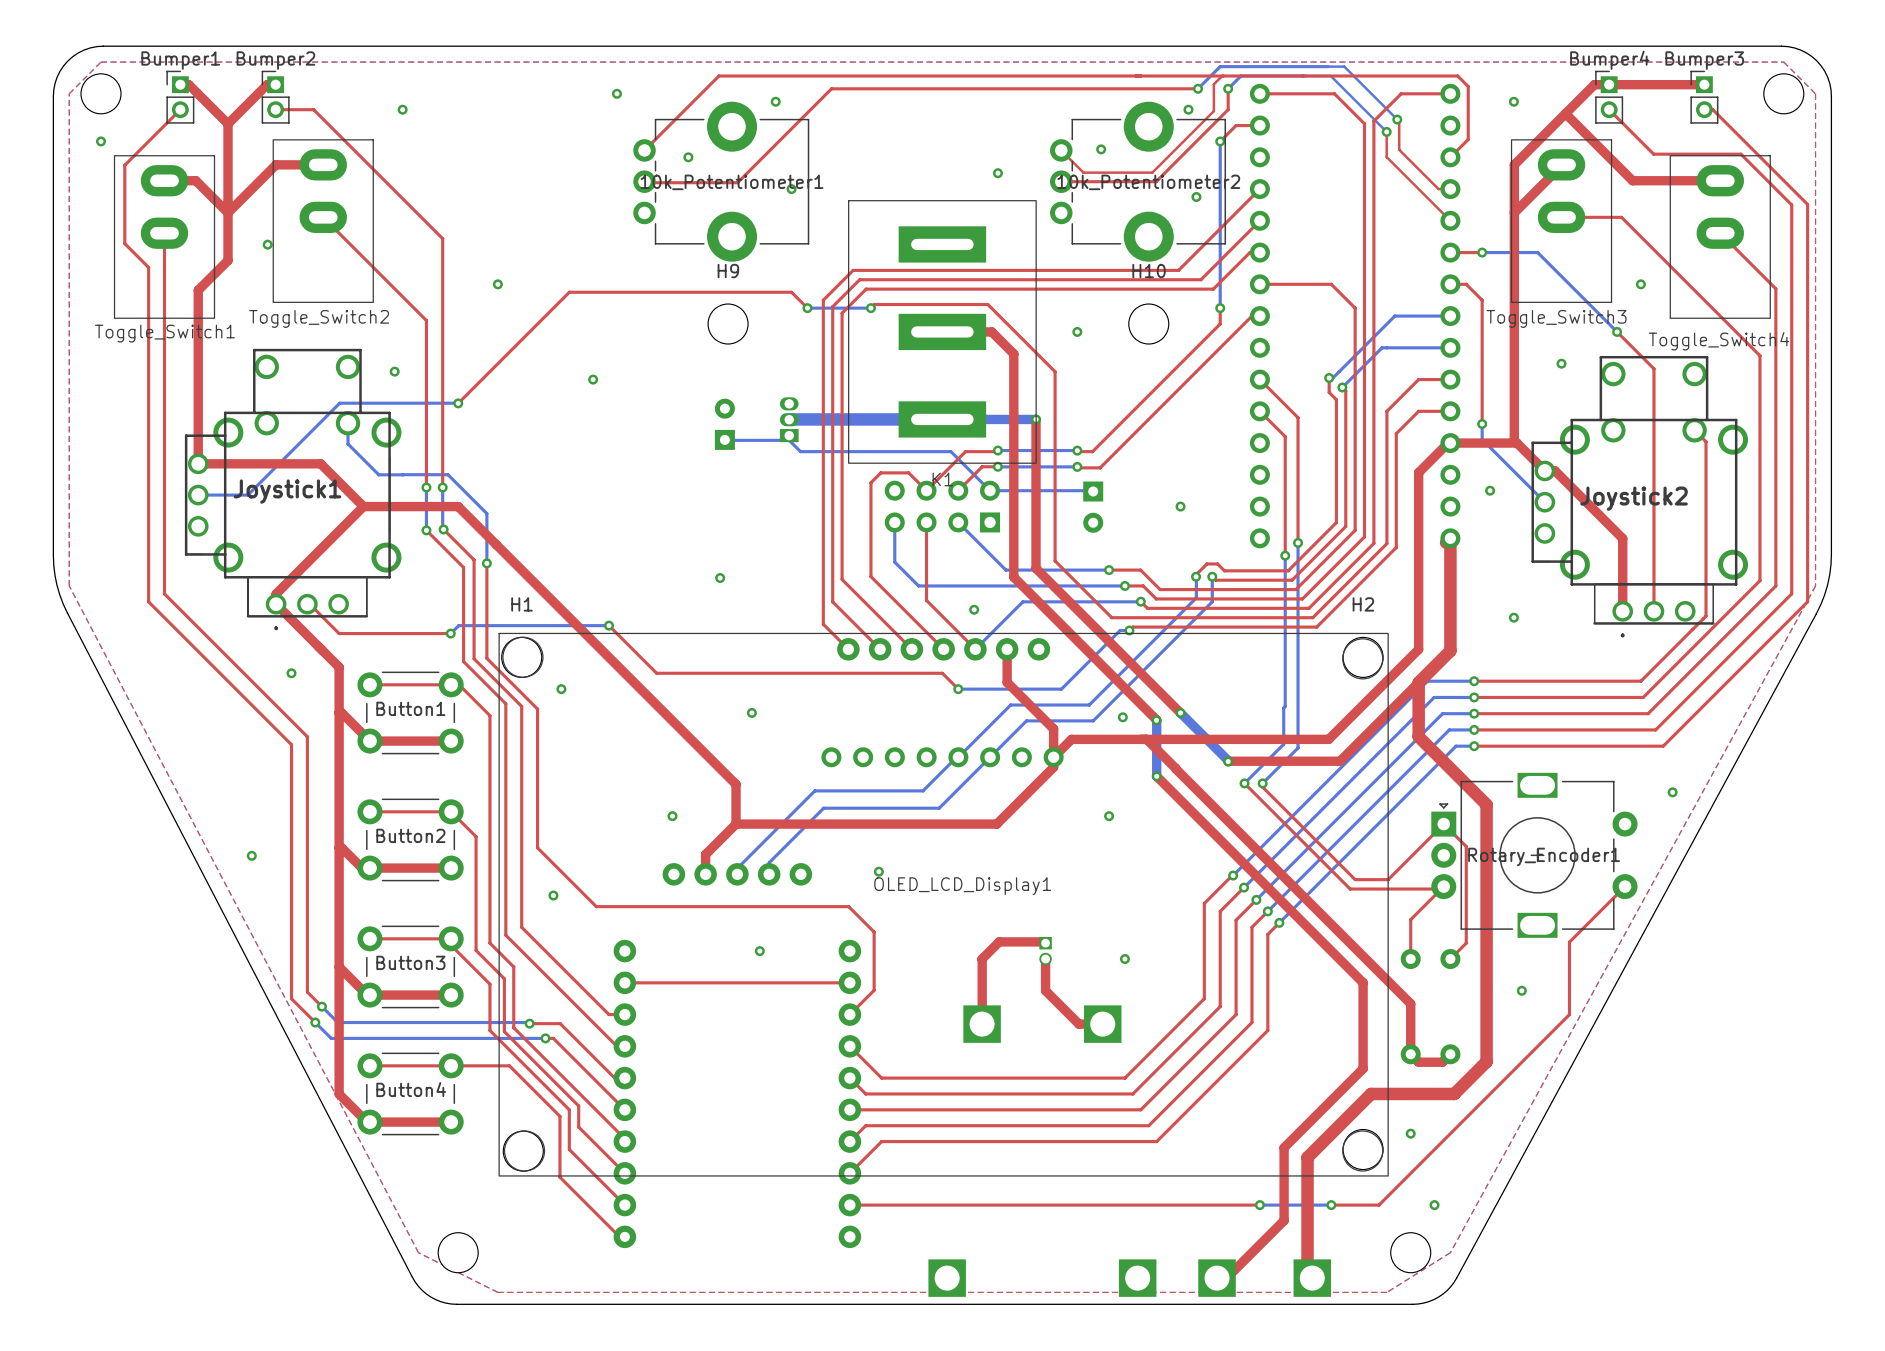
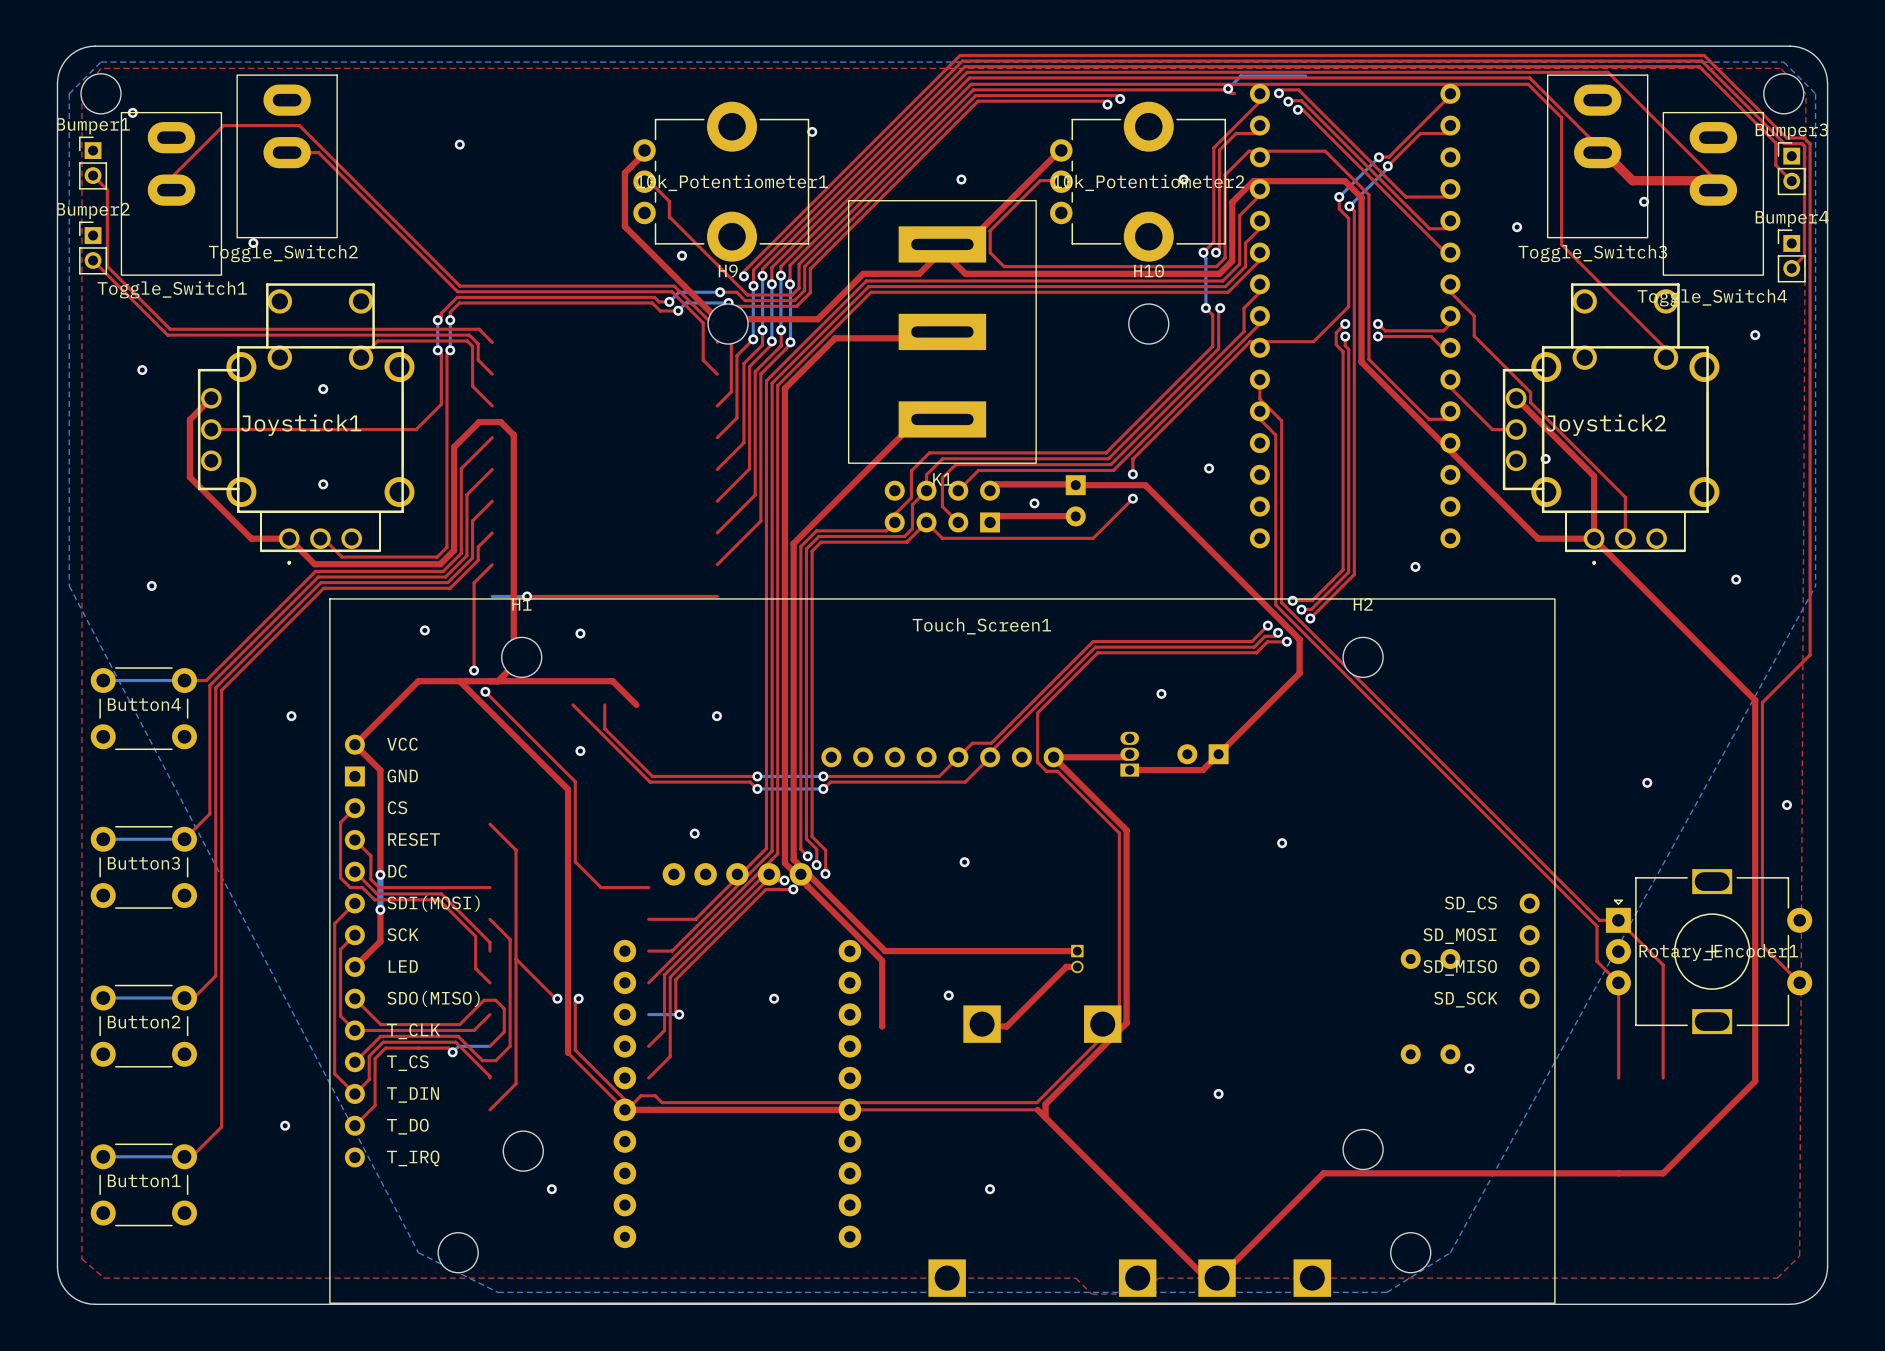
board edge: (103, 46) (84, 49) (68, 60) (57, 77) (53, 89) (53, 555) (56, 585) (67, 613) (412, 1277) (422, 1290) (430, 1297) (445, 1303) (456, 1304) -> (103, 46) (85, 47) (72, 53) (60, 69) (57, 83) (58, 1276) (68, 1293) (80, 1301) (90, 1303) (456, 1304)
board edge: (1781, 46) (1800, 49) (1816, 60) (1827, 77) (1830, 89) (1831, 554) (1827, 584) (1816, 613) (1456, 1278) (1446, 1290) (1438, 1297) (1423, 1303) (1412, 1304) -> (1781, 46) (1799, 47) (1812, 53) (1824, 69) (1827, 83) (1826, 1276) (1819, 1289) (1812, 1296) (1794, 1303) (1412, 1304)
top zone outline: (101, 62) (69, 93) (69, 585) (418, 1252) (497, 1292) (1386, 1292) (1450, 1252) (1815, 585) (1815, 93) (1783, 62) (101, 62) -> (101, 68) (81, 93) (81, 1259) (104, 1278) (1075, 1278) (1091, 1293) (1142, 1293) (1158, 1278) (1777, 1278) (1799, 1255) (1806, 93) (1780, 68) (101, 68)
top track: (1223, 76) (1213, 84) (1213, 111) (1152, 172) (1083, 172) (1061, 150) -> none
bottom track: (1302, 76) (1330, 76) (1386, 131) -> none
top track: (180, 84) (188, 84) (228, 123) -> none
top track: (275, 84) (267, 84) (228, 123) -> none
top track: (1704, 84) (1594, 84) (1514, 164) (1514, 440) (1544, 470) (1555, 470) (1622, 538) (1622, 611) -> none
top track: (1197, 88) (831, 88) (737, 182) (644, 181) -> none
bottom track: (1197, 88) (1220, 66) (1344, 66) (1397, 119) -> none
via: (1197, 88) -> none
top track: (1228, 88) (1228, 109) (1156, 181) (1061, 181) -> none
via: (616, 93) -> none
top track: none -> (1234, 93) (1230, 93) (1227, 89) (973, 89) (799, 264) (799, 288) (792, 295) (747, 295) (669, 217) (669, 201) (648, 180)
top track: (1259, 93) (1334, 93) (1364, 123) (1364, 536) (1302, 598) (1156, 598) (1143, 585) (1124, 585) -> none
top track: none -> (1278, 93) (1282, 89) (1298, 89) (1405, 197) (1450, 197)
via: none -> (1278, 93)
top track: (1450, 93) (1401, 93) (1373, 121) (1373, 543) (1308, 608) (1147, 608) (1140, 601) -> none
Bumper1 position: (180, 97) -> (93, 163)
Bumper2 position: (275, 97) -> (93, 248)
Bumper4 position: (1609, 97) -> (1791, 255)
Bumper3 position: (1704, 97) -> (1791, 168)
via: none -> (1120, 98)
via: (775, 101) -> none
top track: none -> (1288, 101) (1301, 100) (1429, 228) (1450, 228)
via: none -> (1288, 101)
top track: none -> (1450, 101) (1444, 101) (1388, 157) (1378, 157)
via: (1513, 101) -> none
top track: none -> (1107, 104) (1104, 101) (978, 101) (810, 268) (810, 292) (796, 306) (731, 306) (728, 303)
via: none -> (1107, 104)
top track: (180, 109) (124, 165) (124, 243) (148, 267) (148, 601) (291, 744) (291, 998) (315, 1022) -> none
top track: (275, 109) (313, 109) (442, 238) (442, 487) -> none
via position: (402, 109) -> (459, 144)
via: (1188, 109) -> none
top track: none -> (1297, 109) (1302, 109) (1450, 257) (1450, 260)
via: none -> (1297, 109)
top track: (1609, 109) (1653, 154) (1740, 154) (1791, 204) (1791, 593) (1655, 729) (1474, 729) -> none
top track: (1704, 109) (1712, 109) (1807, 204) (1807, 601) (1663, 746) (1474, 746) -> none
top track: none -> (1565, 113) (1529, 77) (969, 77) (780, 266) (780, 275)
top track width: thick (1565, 113) (1597, 145) -> thin (1565, 113) (1597, 145)
top track: (1397, 119) (1399, 121) (1399, 149) (1438, 189) (1450, 189) -> none
via: (1397, 119) -> none
top track: (228, 123) (228, 260) (198, 290) (198, 463) (320, 463) (363, 506) -> none
top track: (1236, 125) (1259, 125) -> (1236, 125) (1259, 101)
via: none -> (812, 131)
top track: (1386, 131) (1386, 157) (1450, 220) -> none
via: (1386, 131) -> none
top track: none -> (1259, 133) (1236, 133) (1219, 150) (1219, 249) (1216, 252)
top track: none -> (1450, 133) (1420, 133) (1387, 166)
via position: (101, 141) -> (132, 112)
top track: none -> (1220, 141) (1213, 147) (1213, 241) (1203, 252)
bottom track: (1220, 141) (1220, 308) -> none
via: (1220, 141) -> none
top track: none -> (648, 149) (624, 172) (624, 226) (717, 319) (817, 319) (863, 273) (919, 273) (942, 250)
top track: none -> (1061, 149) (959, 250) (942, 250)
via: (1101, 149) -> none
top track: (644, 150) (718, 76) (1457, 76) (1468, 86) (1468, 139) (1450, 157) -> none
top track: none -> (287, 152) (318, 152) (457, 291) (672, 291) (703, 322) (703, 360) (717, 374)
via: (688, 157) -> none
bottom track: none -> (1378, 157) (1339, 197)
via: none -> (1378, 157)
top track: (323, 164) (276, 164) (228, 212) (195, 180) (164, 180) -> none
top track: none -> (1561, 164) (1561, 117) (1528, 84) (971, 84) (790, 265) (790, 284)
top track: (1561, 165) (1514, 212) -> (1561, 165) (1561, 244) (1665, 349) (1665, 357)
bottom track: none -> (1387, 166) (1349, 206)
via: none -> (1387, 166)
via position: (997, 173) -> (961, 179)
top track: none -> (93, 175) (107, 189) (107, 266) (170, 329) (479, 329) (492, 342)
top track: none -> (1061, 180) (1040, 180) (990, 230) (990, 252) (1004, 266) (1216, 266) (1225, 258) (1225, 175) (1248, 151) (1325, 151) (1368, 194) (1368, 359) (1428, 419) (1450, 419)
top track: none -> (1791, 181) (1775, 165) (1775, 143) (1699, 66) (964, 66) (762, 268) (762, 275)
via: (791, 189) -> none
top track: (1259, 189) (1178, 270) (853, 270) (823, 300) (823, 624) (848, 649) -> none
top track: none -> (171, 190) (171, 177) (223, 125) (299, 125) (460, 286) (674, 286) (717, 329) (717, 342)
top track: none -> (1713, 190) (1713, 177) (1608, 72) (967, 72) (771, 267) (771, 284)
via position: (1196, 197) -> (1183, 179)
top track: none -> (1259, 197) (1239, 215) (1239, 264) (1222, 281) (866, 281) (766, 380) (766, 848) (695, 919) (648, 919)
top track: none -> (1339, 197) (1339, 208) (1348, 218) (1348, 306) (1313, 341) (1250, 341) (1132, 458) (1132, 474)
via: none -> (1339, 197)
via: none -> (1644, 201)
top track: none -> (1349, 206) (1354, 211) (1354, 574) (1310, 618)
via: none -> (1349, 206)
top track: (323, 217) (426, 320) (426, 487) -> none
top track: (1561, 217) (1621, 217) (1759, 355) (1759, 580) (1643, 697) (1474, 697) -> none
top track: (1259, 220) (1200, 279) (859, 279) (832, 306) (832, 601) (880, 649) -> none
Toggle_Switch2 position: (323, 221) -> (287, 156)
Toggle_Switch3 position: (1561, 221) -> (1597, 156)
top track: (164, 233) (164, 593) (307, 736) (307, 992) (321, 1006) -> none
top track: (1720, 233) (1775, 288) (1775, 585) (1648, 713) (1474, 713) -> none
Toggle_Switch1 position: (164, 236) -> (171, 193)
Toggle_Switch4 position: (1720, 236) -> (1713, 193)
via position: (267, 244) -> (253, 243)
top track: none -> (942, 250) (965, 273) (1219, 273) (1232, 261) (1232, 202) (1253, 181) (1344, 181) (1361, 197) (1361, 362) (1538, 538) (1594, 538)
bottom track: none -> (1203, 252) (1205, 258) (1205, 308)
via: none -> (1203, 252)
via: none -> (1216, 252)
top track: (1259, 252) (1249, 252) (1213, 289) (866, 289) -> (1259, 228) (1245, 243) (1245, 266) (1225, 286) (868, 286) (866, 289)
top track: (1450, 252) (1482, 252) -> none
bottom track: (1482, 252) (1537, 252) (1617, 331) -> none
via position: (1482, 252) -> (1517, 227)
via: none -> (682, 255)
top track: none -> (93, 260) (167, 335) (469, 335) (478, 344) (478, 360) (492, 374)
top track: none -> (1259, 260) (1228, 292) (870, 292) (777, 385) (777, 853) (648, 982)
top track: none -> (1791, 268) (1804, 255) (1804, 146) (1801, 143) (1784, 143) (1701, 61) (962, 61) (753, 270) (753, 285)
bottom track: none -> (762, 275) (762, 330)
via: none -> (762, 275)
bottom track: none -> (780, 275) (781, 330)
via: none -> (780, 275)
top track: none -> (743, 276) (743, 271) (960, 55) (1704, 55) (1786, 138) (1804, 138) (1810, 143) (1810, 654) (1762, 702) (1762, 945) (1799, 982)
via: none -> (743, 276)
via: (497, 284) -> none
bottom track: none -> (771, 284) (771, 341)
via: none -> (771, 284)
bottom track: none -> (790, 284) (790, 342)
via: none -> (790, 284)
top track: (1259, 284) (1331, 284) (1355, 308) (1355, 530) (1295, 589) (1160, 589) (1140, 570) (1109, 570) -> none
top track: (1450, 284) (1466, 284) (1482, 300) (1482, 424) -> none
via: (1640, 284) -> none
bottom track: none -> (753, 285) (753, 339)
via: none -> (753, 285)
top track: (720, 292) (569, 292) (458, 403) -> none
bottom track: none -> (720, 292) (679, 292) (669, 301)
via: none -> (720, 292)
top track: (736, 292) (791, 292) (807, 308) -> (736, 292) (745, 300) (794, 300) (804, 290) (804, 266) (975, 95) (1116, 95) (1120, 98)
top track: none -> (1259, 292) (1244, 308) (1244, 331) (1110, 464) (955, 464) (942, 478) (942, 506) (958, 522)
top track: none -> (1450, 292) (1474, 316) (1474, 335) (1530, 392) (1530, 402) (1625, 497) (1625, 538)
top track: none -> (669, 301) (659, 301) (654, 297) (457, 297) (441, 313) (441, 316) (437, 320)
via: none -> (669, 301)
bottom track: none -> (728, 303) (685, 303) (678, 310)
via: none -> (728, 303)
bottom track: (807, 308) (870, 308) -> none
via: (807, 308) -> none
top track: (870, 308) (874, 304) (987, 304) (1055, 371) (1055, 560) (1111, 617) (1312, 617) (1386, 543) (1386, 411) (1418, 379) (1450, 379) -> none
via: (870, 308) -> none
top track: none -> (1205, 308) (1212, 315) (1212, 346) (1106, 452) (929, 452) (911, 470) (911, 497) (894, 514) (894, 522) (886, 530) (816, 530) (800, 546) (800, 849) (807, 856)
via: none -> (1205, 308)
top track: none -> (1218, 308) (1218, 348) (1108, 458) (942, 458) (926, 474) (926, 490) (912, 504) (912, 528) (904, 536) (818, 536) (806, 548) (806, 838) (816, 849) (816, 860)
top track: (1220, 308) (1220, 324) (1092, 451) (1077, 450) -> none
top track: none -> (678, 310) (660, 310) (652, 303) (459, 303) (450, 312) (450, 320)
via: none -> (678, 310)
top track: (842, 313) (842, 579) (911, 649) -> (842, 313) (772, 383) (772, 851) (672, 951) (648, 951)
top track: (1259, 316) (1251, 316) (1100, 467) (1077, 466) -> none
bottom track: (1450, 316) (1394, 316) (1332, 378) (1329, 378) -> none
bottom track: none -> (437, 320) (437, 350)
via: none -> (437, 320)
bottom track: none -> (450, 320) (450, 350)
via: none -> (450, 320)
top track: none -> (1345, 324) (1336, 332) (1336, 344) (1343, 351) (1343, 569) (1312, 600) (1292, 600)
via: none -> (1345, 324)
top track: none -> (1378, 324) (1385, 330) (1443, 330) (1450, 324)
via: none -> (1378, 324)
top track: none -> (743, 330) (731, 342) (731, 391) (717, 405)
top track: none -> (762, 330) (762, 344) (743, 363) (743, 442) (717, 469)
via: none -> (762, 330)
top track: none -> (781, 330) (781, 345) (755, 371) (755, 495) (717, 532)
via: none -> (781, 330)
top track: (942, 331) (991, 331) (1013, 353) (1013, 577) (1156, 720) -> none
via: (1077, 331) -> none
top track: (1617, 331) (1653, 368) (1653, 611) -> none
via: (1617, 331) -> none
via: none -> (1755, 335)
top track: none -> (1345, 336) (1345, 345) (1348, 349) (1348, 572) (1311, 609) (1301, 609)
via: none -> (1345, 336)
top track: none -> (1378, 336) (1431, 336) (1450, 355)
via: none -> (1378, 336)
top track: none -> (942, 338) (835, 338) (784, 388) (784, 863) (882, 960) (882, 1026)
top track: none -> (753, 339) (736, 355) (736, 418) (717, 437)
via: none -> (753, 339)
top track: none -> (771, 341) (771, 344) (749, 366) (749, 468) (717, 501)
via: none -> (771, 341)
top track: none -> (790, 342) (760, 374) (760, 521) (717, 564)
via: none -> (790, 342)
bottom track: (1450, 347) (1382, 347) (1342, 387) -> none
top track: none -> (437, 350) (441, 353) (441, 404) (416, 429) (211, 429)
via: none -> (437, 350)
via: none -> (450, 350)
top track: none -> (446, 353) (446, 547) (437, 557) (341, 557) (322, 537) (320, 538)
top track: none -> (361, 357) (377, 341) (467, 341) (472, 346) (472, 386) (492, 405)
via: (1561, 363) -> none
via: none -> (142, 370)
via: (394, 371) -> none
top track: (1329, 378) (1329, 392) (1336, 399) (1336, 522) (1288, 570) (1224, 570) (1217, 563) (1206, 563) (1196, 576) -> none
via: (1329, 378) -> none
via: (593, 379) -> none
top track: (1259, 379) (1298, 417) (1298, 542) -> none
top track: none -> (1259, 387) (1259, 399) (1281, 420) (1281, 602) (1599, 920) (1618, 920) (1663, 965) (1663, 1078)
top track: (1342, 387) (1345, 390) (1345, 526) (1292, 580) (1215, 580) (1212, 576) -> none
via: (1342, 387) -> none
top track: none -> (1450, 387) (1492, 429) (1516, 429)
via: none -> (323, 389)
top track: none -> (211, 398) (189, 419) (189, 477) (251, 538) (289, 538) (314, 564) (440, 564) (454, 550) (454, 447) (479, 422) (500, 422) (513, 435) (513, 665) (497, 681)
bottom track: (458, 403) (339, 403) (247, 495) (198, 495) -> none
via: (458, 403) -> none
top track: (1259, 411) (1285, 436) (1285, 555) -> none
top track: (1450, 411) (1418, 411) (1396, 433) (1396, 547) (1316, 627) (1132, 627) (1129, 630) -> none
part: (789, 419) -> none
bottom track: (790, 419) (1036, 419) -> none
top track: (1036, 419) (1036, 568) (1180, 712) -> none
via: (1036, 419) -> none
top track: none -> (1259, 419) (1275, 435) (1275, 605) (1596, 926) (1596, 961) (1618, 983) (1618, 1078)
bottom track: (348, 423) (348, 444) (378, 474) (402, 474) -> none
part: (724, 424) -> none
bottom track: (1482, 424) (1482, 439) (1544, 502) -> none
via: (1482, 424) -> none
top track: none -> (942, 425) (911, 425) (793, 543) (793, 859) (885, 951) (1077, 951)
top track: (1694, 430) (1706, 441) (1706, 616) (1640, 681) (1474, 681) -> none
top track: none -> (492, 437) (461, 468) (461, 553) (443, 571) (315, 571) (206, 680) (184, 680)
bottom track: (724, 439) (789, 440) (800, 451) (950, 451) (990, 490) (1093, 491) -> none
top track: (1516, 443) (1448, 443) (1418, 472) (1418, 649) (1328, 739) (1071, 739) (1053, 757) -> none
top track: (997, 450) (965, 451) (926, 490) (908, 472) (880, 472) (870, 482) (870, 576) (943, 649) -> none
bottom track: (997, 450) (1077, 450) -> none
via: (997, 450) -> none
via: (1077, 450) -> none
via: none -> (1545, 458)
top track: (997, 466) (982, 466) (978, 470) -> (1259, 324) (1113, 470) (978, 470)
via: (997, 466) -> none
bottom track: (998, 466) (1077, 466) -> none
via: (1077, 466) -> none
via: none -> (1209, 468)
top track: none -> (492, 469) (466, 494) (466, 555) (445, 577) (318, 577) (209, 685) (209, 813) (184, 839)
bottom track: (402, 474) (448, 474) (486, 513) (486, 563) -> none
via: none -> (1132, 474)
via: none -> (323, 484)
bottom track: (426, 487) (426, 530) -> none
via: (426, 487) -> none
bottom track: (442, 487) (443, 529) -> none
via: (442, 487) -> none
Joystick1 position: (293, 489) -> (306, 423)
top track: none -> (990, 490) (996, 484) (1145, 485) (1299, 639) (1299, 673) (1202, 770) (1129, 770)
via: (1490, 490) -> none
Joystick2 position: (1639, 496) -> (1611, 423)
top track: none -> (1132, 498) (1093, 538) (942, 538) (926, 522) (906, 542) (821, 542) (812, 551) (812, 836) (825, 850) (825, 873)
via: none -> (1132, 498)
top track: none -> (492, 501) (472, 520) (472, 557) (447, 582) (320, 582) (215, 687) (215, 975) (193, 998) (184, 998)
via: none -> (1034, 503)
top track: (363, 506) (276, 593) (276, 604) (339, 667) (339, 1094) (367, 1122) (451, 1122) -> none
top track: (363, 506) (458, 506) (736, 784) (736, 824) -> none
via: (1180, 506) -> none
part position: (1093, 507) -> (1075, 500)
top track: none -> (1075, 516) (996, 516) (990, 522)
bottom track: (894, 522) (894, 562) (918, 585) (1124, 585) -> none
top track: (926, 522) (926, 600) (975, 649) -> none
bottom track: (958, 522) (1005, 570) (1109, 570) -> none
top track: (443, 529) (474, 559) (474, 582) -> (492, 564) (474, 582)
via: (443, 529) -> none
top track: (426, 530) (463, 567) (463, 661) (505, 703) (505, 935) -> (489, 919) (505, 935)
via: (426, 530) -> none
top track: none -> (492, 532) (478, 547) (478, 560) (450, 588) (323, 588) (221, 690) (221, 1126) (191, 1156) (184, 1156)
bottom track: (1298, 542) (1298, 748) (1262, 783) -> none
via: (1298, 542) -> none
top track: (1446, 542) (1450, 538) (1450, 650) (1418, 682) -> none
bottom track: (1285, 555) (1283, 744) (1244, 783) -> none
via: (1285, 555) -> none
top track: (486, 563) (486, 658) (537, 709) (537, 847) (596, 906) (848, 906) (874, 932) (874, 990) (849, 1014) -> none
via: (486, 563) -> none
via: none -> (1415, 566)
via: (1109, 570) -> none
bottom track: (1196, 576) (1196, 597) (1089, 705) (1010, 705) (923, 790) (814, 790) (737, 868) (737, 874) -> none
via: (1196, 576) -> none
bottom track: (1212, 576) (1212, 601) (1093, 720) (1026, 720) (939, 808) (823, 808) (769, 862) (769, 874) -> none
via: (1212, 576) -> none
via: (720, 578) -> none
via: none -> (1736, 579)
via: none -> (151, 585)
via: (1124, 585) -> none
bottom track: none -> (492, 596) (527, 596)
top track: none -> (527, 596) (717, 596)
via: none -> (527, 596)
via: none -> (1292, 600)
bottom track: (1140, 601) (1022, 601) (975, 649) -> none
via: (1140, 601) -> none
top track: (307, 604) (309, 604) (339, 633) (450, 633) -> none
via: (974, 609) -> none
via: none -> (1301, 609)
via: (1513, 617) -> none
via: none -> (1310, 618)
top track: (609, 625) (656, 673) (942, 673) (958, 689) -> none
bottom track: (609, 625) (458, 625) (450, 633) -> none
via: (609, 625) -> none
top track: none -> (1267, 625) (1251, 641) (1093, 641) (991, 743) (972, 743) (939, 776) (823, 776)
via: none -> (1267, 625)
via: none -> (424, 630)
bottom track: (1129, 630) (1120, 630) (1061, 689) (958, 689) -> none
via: (1129, 630) -> none
top track: none -> (1278, 632) (1274, 636) (1265, 636) (1254, 647) (1095, 647) (990, 752) (990, 757) (965, 782) (830, 782) (823, 788)
via: none -> (1278, 632)
via: (450, 633) -> none
via: none -> (580, 633)
top track: none -> (1286, 641) (1267, 641) (1256, 652) (1097, 652) (1037, 712) (1037, 762) (1046, 771) (1057, 771) (1119, 833) (1119, 1020) (1036, 1102) (662, 1102) (655, 1095) (640, 1095) (634, 1102) (627, 1102) (575, 1050) (575, 1002) (578, 998)
via: none -> (1286, 641)
top track: (1005, 648) (1007, 682) (1053, 728) (1053, 767) (996, 824) (736, 824) -> none
top track: (474, 658) (521, 706) (521, 927) (609, 1014) (624, 1014) -> (474, 658) (474, 670)
via: none -> (474, 670)
via position: (291, 673) -> (291, 716)
bottom track: none -> (103, 680) (184, 680)
bottom track: (1474, 681) (1427, 681) (1233, 875) -> none
via: (1474, 681) -> none
top track: (1418, 682) (1340, 761) (1228, 761) -> none
top track: (1418, 682) (1418, 736) (1486, 804) (1486, 1061) (1454, 1093) (1371, 1093) (1307, 1157) (1307, 1273) (1312, 1278) -> none
top track: (369, 684) (459, 684) (489, 715) (489, 942) -> (354, 871) (377, 893) (441, 893) (489, 942)
via: (561, 689) -> none
via: (958, 689) -> none
top track: none -> (485, 691) (575, 781) (575, 861) (601, 887) (648, 887)
via: none -> (485, 691)
via: none -> (1161, 693)
bottom track: (1474, 697) (1434, 697) (1244, 887) -> none
via: (1474, 697) -> none
top track: none -> (573, 704) (650, 782) (750, 782) (757, 788)
top track: none -> (604, 704) (604, 728) (652, 776) (757, 776)
top track: none -> (636, 704) (612, 681) (418, 681) (354, 744) (380, 770) (380, 874)
top track: (339, 712) (341, 712) (369, 741) (451, 741) -> none
Button1 position: (410, 712) -> (143, 1184)
via: (751, 712) -> none
bottom track: (1180, 712) (1228, 761) -> none
via: (1180, 712) -> none
bottom track: (1474, 713) (1442, 713) (1256, 899) -> none
via: (1474, 713) -> none
via: none -> (716, 716)
via: (1122, 717) -> none
bottom track: (1156, 720) (1156, 776) -> none
via: (1156, 720) -> none
bottom track: (1474, 729) (1449, 729) (1267, 911) -> none
via: (1474, 729) -> none
top track: (1146, 739) (1410, 1003) (1410, 1054) (1418, 1062) (1442, 1062) (1450, 1054) -> none
bottom track: (1474, 746) (1456, 746) (1279, 922) -> none
via: (1474, 746) -> none
via: none -> (580, 751)
top track: none -> (1129, 754) (1126, 757) (1053, 757) (1126, 830) (1126, 1023) (1045, 1104) (1045, 1117)
part: none -> (1129, 754)
part: none -> (1203, 754)
via: (1228, 761) -> none
bottom track: none -> (757, 776) (823, 776)
via: none -> (757, 776)
via: none -> (823, 776)
top track: (1156, 776) (1363, 982) (1363, 1068) (1284, 1147) (1284, 1220) (1226, 1278) (1217, 1278) -> none
via: (1156, 776) -> none
top track: (1244, 783) (1350, 889) (1441, 889) -> none
via: (1244, 783) -> none
top track: (1262, 783) (1262, 787) (1355, 879) (1388, 879) (1443, 824) (1466, 846) (1466, 943) (1450, 959) -> none
via: (1262, 783) -> none
bottom track: none -> (757, 788) (823, 788)
via: none -> (757, 788)
via: none -> (823, 788)
via position: (1672, 792) -> (1647, 782)
via: none -> (1786, 805)
top track: none -> (354, 808) (340, 822) (340, 877) (350, 887) (362, 887) (374, 899) (439, 899) (475, 936) (475, 968) (489, 982)
top track: (362, 811) (451, 811) (476, 836) (476, 950) (504, 978) (504, 1031) (578, 1105) (578, 1127) (624, 1173) -> none
via position: (672, 816) -> (694, 833)
via: (1109, 816) -> none
top track: none -> (489, 824) (516, 850) (516, 1083) (489, 1109)
top track: (736, 824) (705, 854) (705, 874) -> none
bottom track: none -> (103, 839) (184, 839)
top track: none -> (354, 839) (370, 855) (370, 879) (379, 887) (489, 887)
Button2 position: (410, 839) -> (143, 1026)
via: none -> (1282, 843)
top track: (339, 847) (341, 847) (362, 868) (443, 868) -> none
via: (251, 855) -> none
Rotary_Encoder1 position: (1534, 855) -> (1709, 951)
via: none -> (807, 856)
via: none -> (964, 862)
via: none -> (816, 865)
top track: none -> (775, 871) (767, 871) (664, 974) (664, 1030) (648, 1046)
via: (878, 871) -> none
via: none -> (825, 873)
bottom track: none -> (380, 874) (380, 909)
via: none -> (380, 874)
top track: (1233, 875) (1204, 903) (1204, 998) (1124, 1078) (881, 1078) (849, 1046) -> none
via: (1233, 875) -> none
top track: none -> (784, 880) (766, 880) (670, 977) (670, 1056) (648, 1078)
via: none -> (784, 880)
top track: (1443, 886) (1410, 919) (1410, 959) -> none
top track: (1625, 886) (1569, 942) (1569, 1014) (1378, 1205) (1331, 1205) -> none
top track: (1244, 887) (1220, 911) (1220, 1006) (1132, 1093) (865, 1093) (849, 1078) -> none
via: (1244, 887) -> none
top track: none -> (793, 889) (766, 889) (675, 979) (675, 1011) (679, 1014)
via: none -> (793, 889)
via: (553, 895) -> none
top track: (1256, 899) (1236, 920) (1236, 1014) (1140, 1109) (1037, 1109) -> (1516, 398) (1594, 476) (1594, 539) (1755, 700) (1755, 1081) (1663, 1173) (1323, 1173) (1216, 1280) (1208, 1280) (1037, 1109)
via: (1256, 899) -> none
top track: none -> (354, 903) (334, 923) (334, 1073) (354, 1093) (369, 1079) (369, 1056) (383, 1042) (455, 1042) (489, 1078)
OLED_LCD_Display1: (943, 904) -> none
top track: none -> (380, 909) (380, 941) (354, 966)
via: none -> (380, 909)
top track: (1267, 911) (1251, 927) (1251, 1022) (1148, 1125) (865, 1125) (849, 1141) -> none
via: (1267, 911) -> none
top track: (1279, 922) (1267, 934) (1267, 1030) (1156, 1141) (881, 1141) (849, 1173) -> none
via: (1279, 922) -> none
top track: none -> (354, 935) (340, 949) (340, 1016) (354, 1030) (474, 1030) (489, 1014)
top track: (369, 938) (451, 938) (451, 945) (489, 984) (489, 1030) (569, 1109) (569, 1149) (624, 1205) -> none
top track: (510, 939) (616, 1046) (624, 1046) -> (510, 939) (510, 1046) (495, 1060) (482, 1060) (458, 1036) (380, 1036) (354, 1062)
top track: (1045, 941) (999, 941) (982, 959) -> none
top track: (489, 943) (513, 966) (513, 1027) (624, 1138) (624, 1141) -> (489, 943) (489, 951)
via: (759, 951) -> none
Touch_Screen1: none -> (942, 951)
part position: (1045, 951) -> (1077, 959)
top track: none -> (516, 959) (557, 998)
top track: (982, 959) (982, 1023) -> none
top track: (1045, 959) (1045, 990) (1078, 1024) (1102, 1024) (1091, 1024) (1085, 1030) -> none
via: (1124, 959) -> none
top track: (339, 966) (367, 995) (451, 995) -> none
Button3 position: (410, 966) -> (143, 867)
top track: none -> (1077, 966) (1066, 966) (1006, 1026) (1002, 1026)
top track: (624, 982) (849, 982) -> (624, 1109) (849, 1109)
via: (1521, 990) -> none
via: none -> (948, 995)
bottom track: none -> (103, 998) (184, 998)
top track: none -> (354, 998) (380, 1024) (459, 1024) (484, 1000) (495, 1000) (504, 1008) (504, 1032) (489, 1046)
via: none -> (557, 998)
via: none -> (578, 998)
via: none -> (774, 998)
bottom track: (321, 1006) (337, 1022) (529, 1023) -> none
via: (321, 1006) -> none
bottom track: none -> (648, 1014) (679, 1014)
via: none -> (679, 1014)
bottom track: (315, 1022) (331, 1038) (545, 1038) -> none
via: (315, 1022) -> none
top track: (529, 1023) (560, 1023) (614, 1078) (624, 1078) -> none
via: (529, 1023) -> none
top track: (545, 1038) (553, 1038) (568, 1053) -> (459, 681) (568, 789) (568, 1053)
via: (545, 1038) -> none
bottom track: none -> (489, 1046) (458, 1046) (452, 1052)
top track: none -> (452, 1052) (448, 1048) (385, 1048) (375, 1058) (375, 1105) (354, 1125)
via: none -> (452, 1052)
top track: (369, 1065) (509, 1065) (559, 1116) (559, 1177) (619, 1236) (624, 1236) -> none
via: none -> (1469, 1068)
Button4 position: (410, 1093) -> (143, 708)
via: none -> (1218, 1093)
via: none -> (285, 1125)
via: (1410, 1133) -> none
bottom track: none -> (103, 1156) (184, 1156)
via: none -> (551, 1189)
via: none -> (990, 1189)
top track: (849, 1205) (1259, 1205) -> none
bottom track: (1259, 1205) (1331, 1205) -> none
via: (1259, 1205) -> none
via: (1331, 1205) -> none
via: (1434, 1205) -> none

